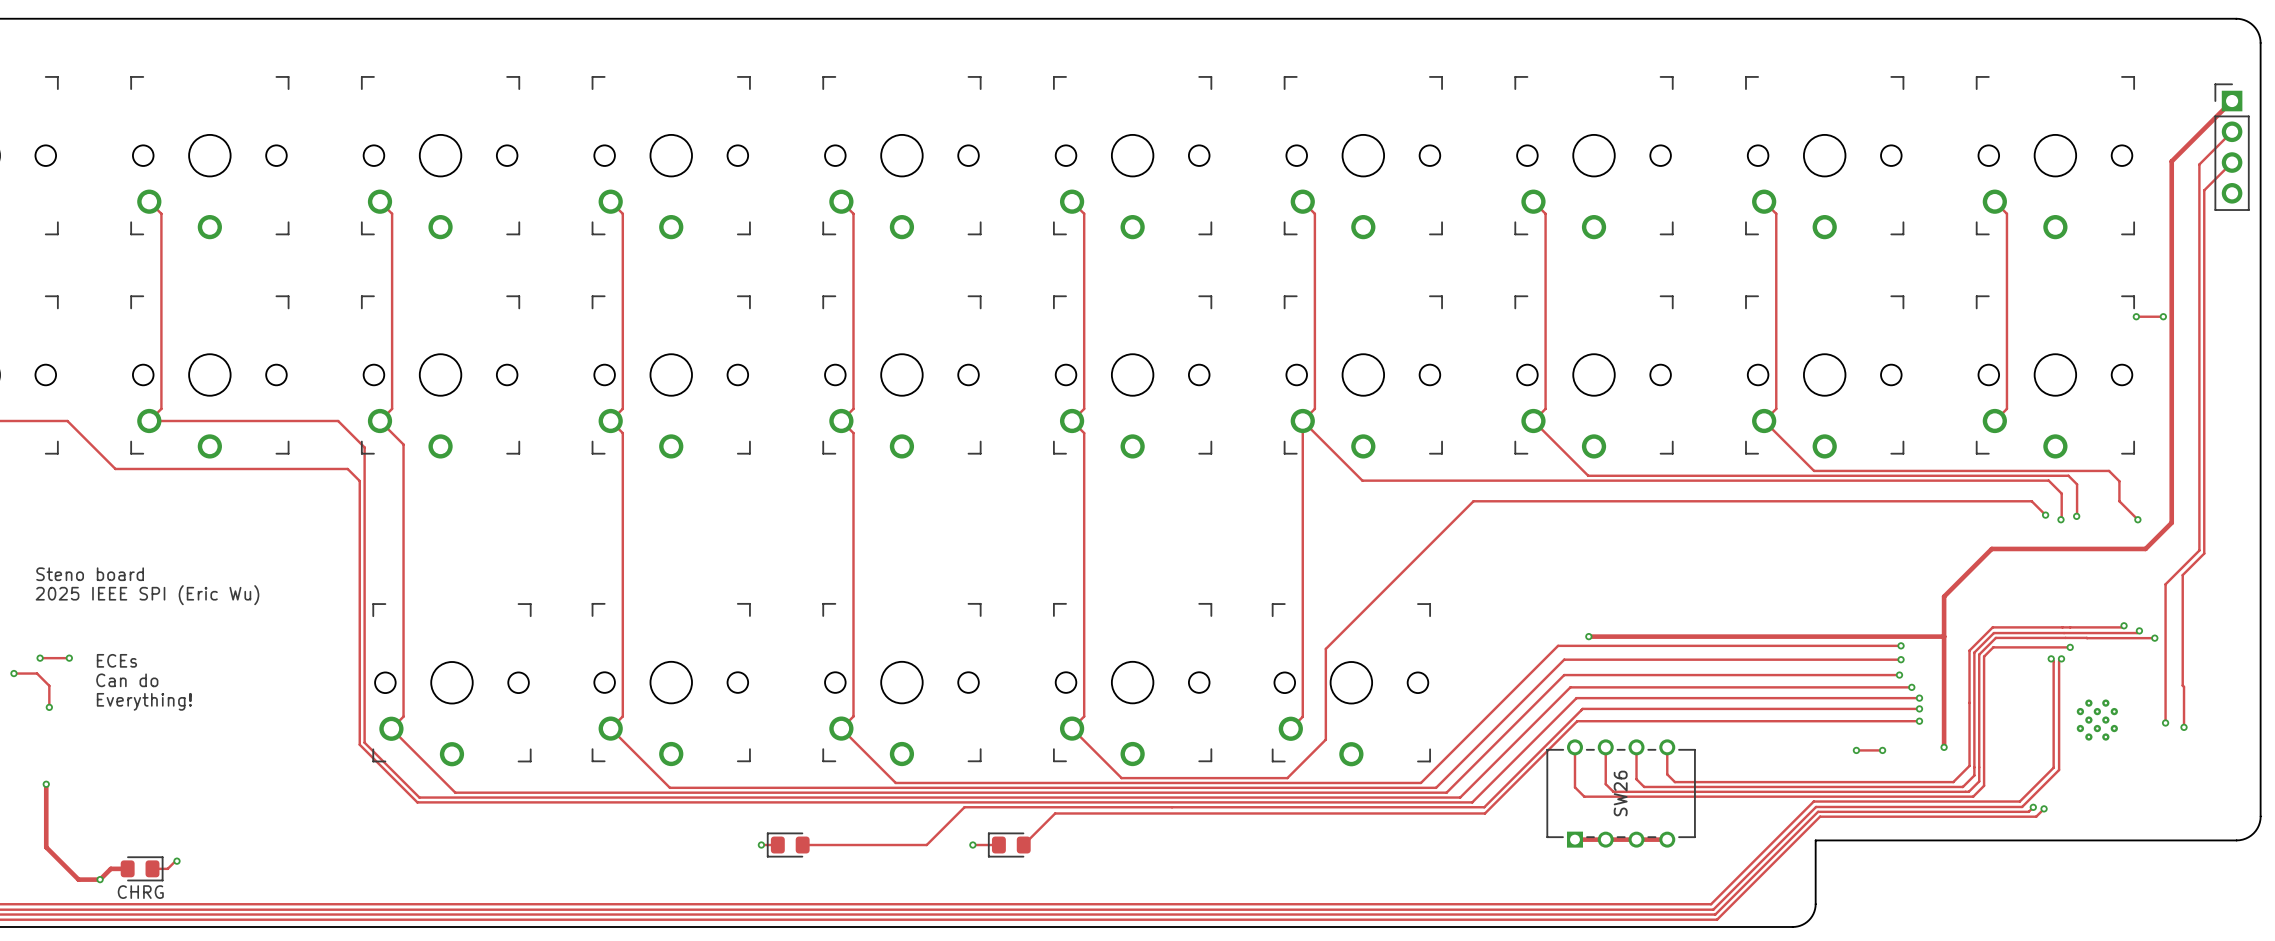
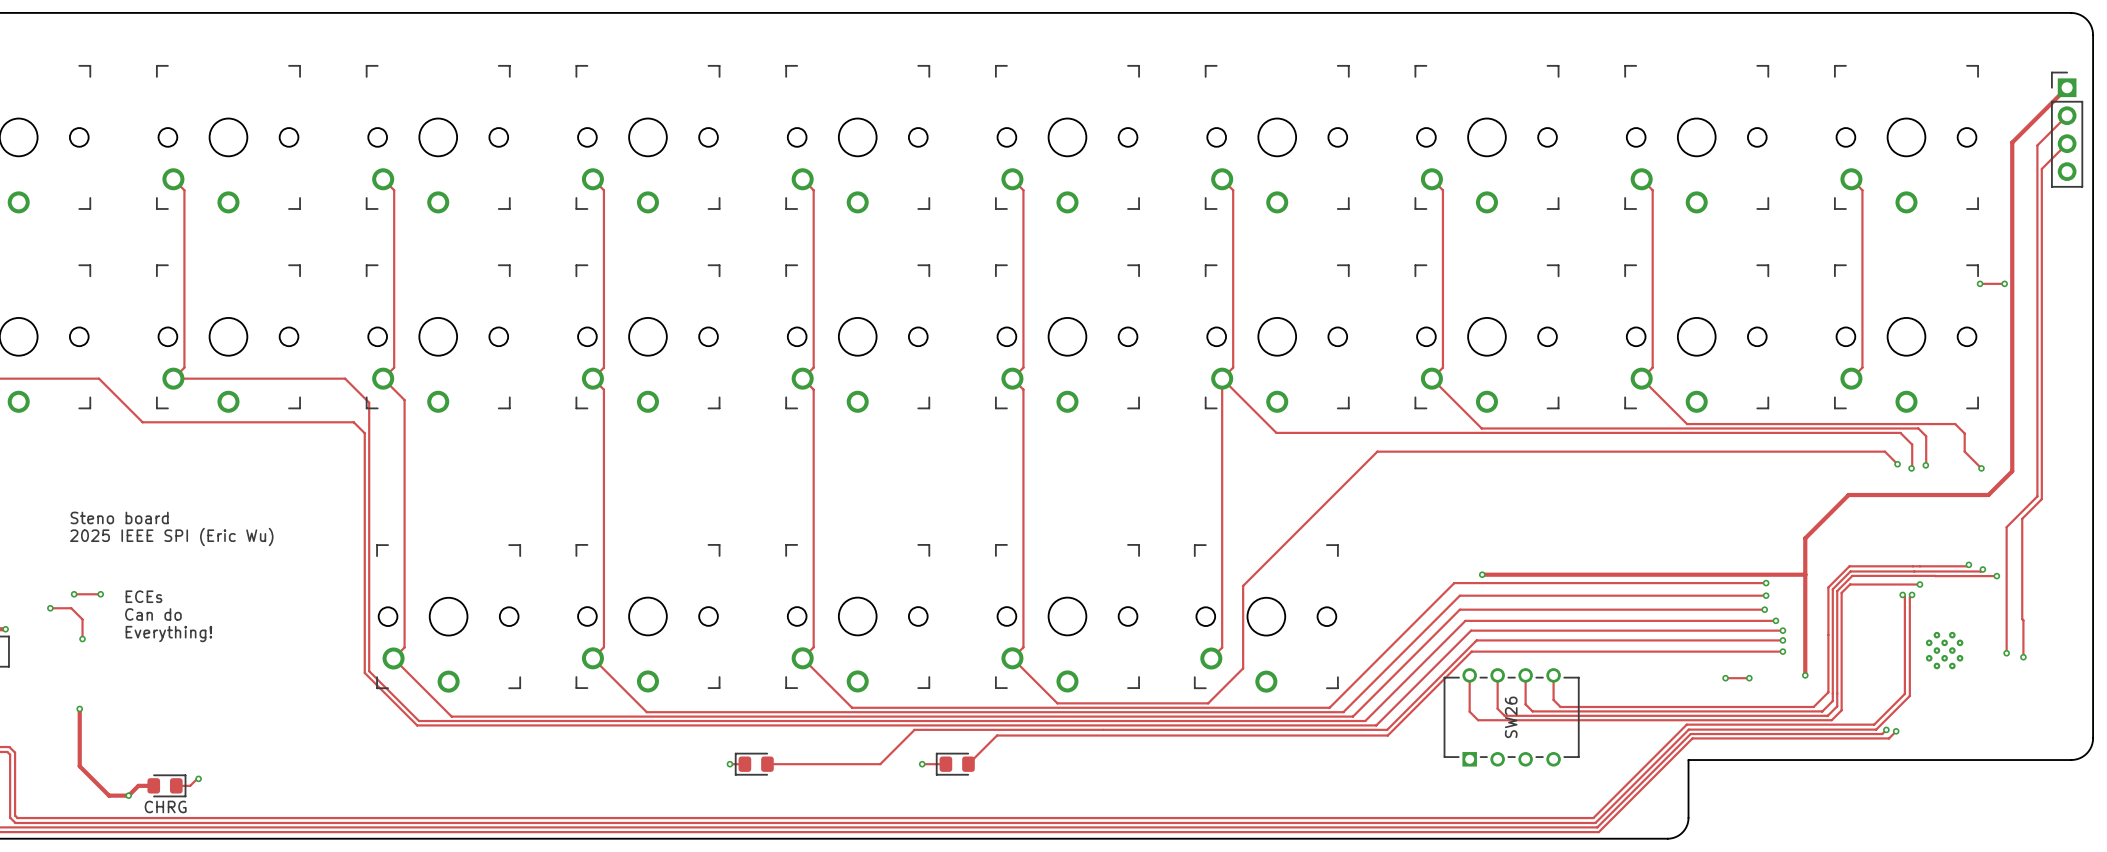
track: (1574, 839) (1667, 839) -> none

